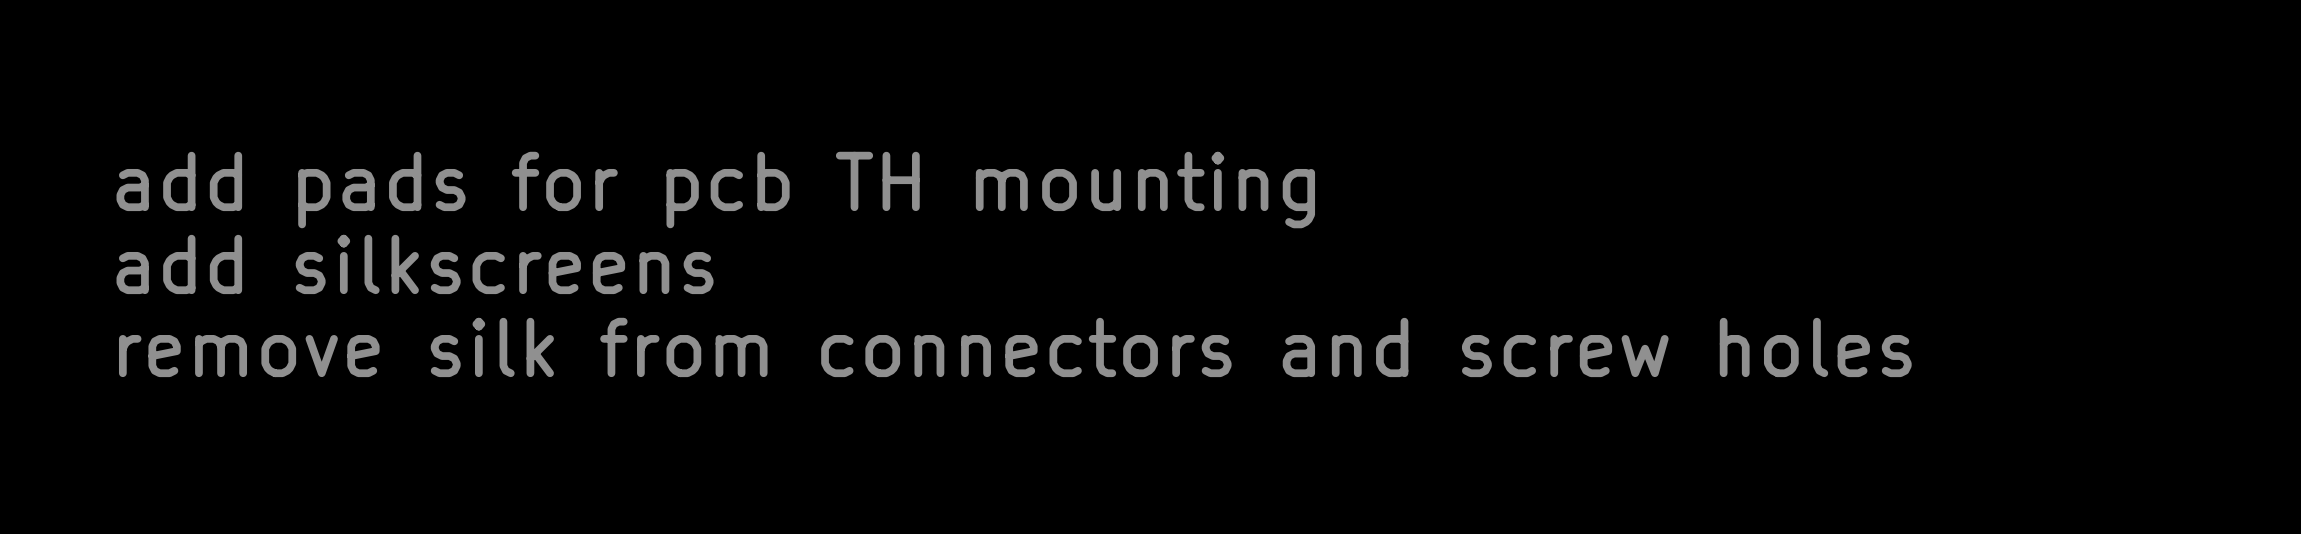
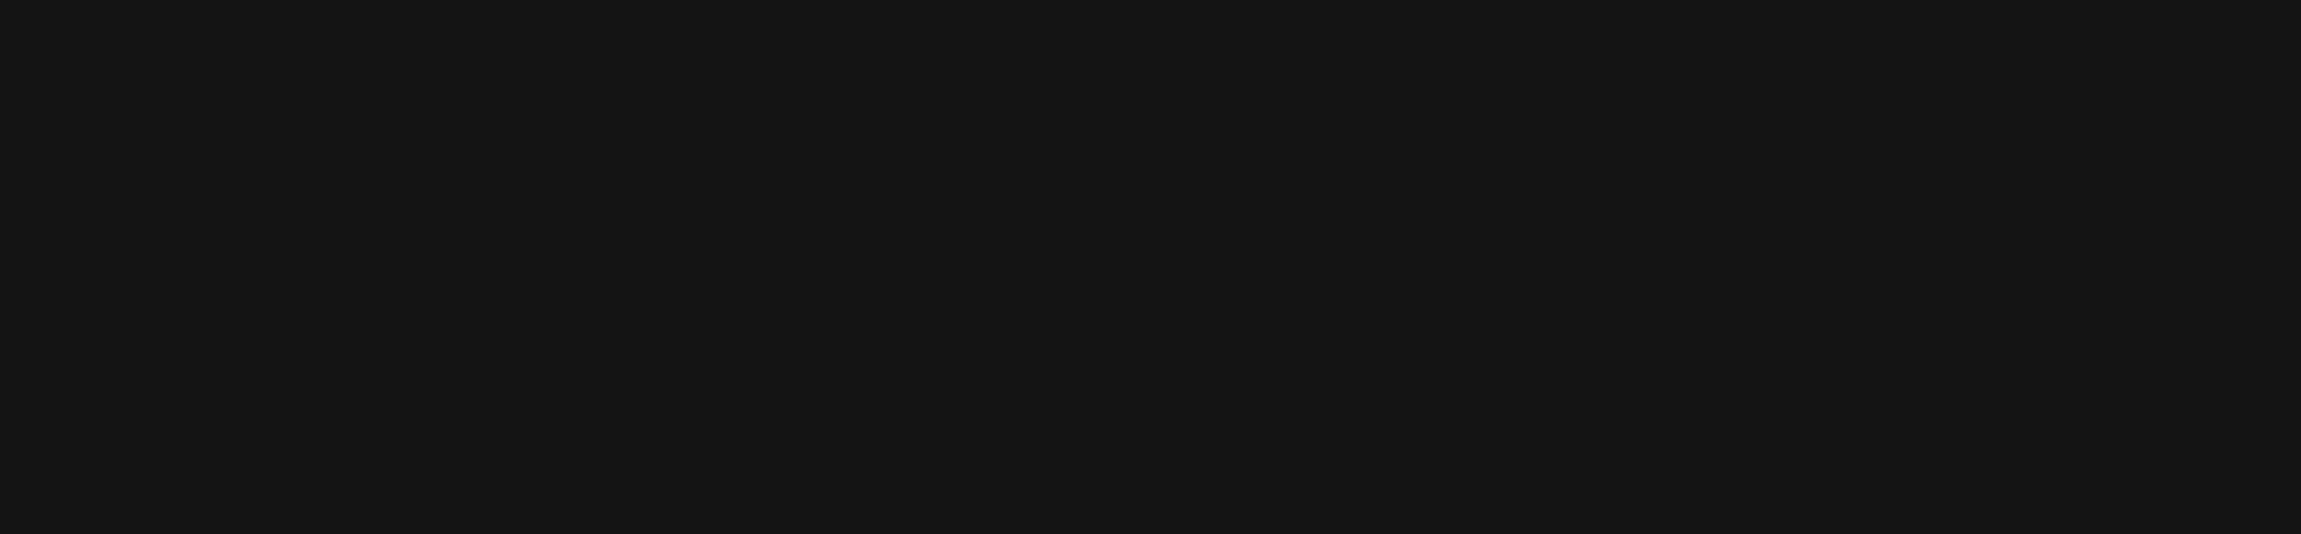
text: add pads for pcb TH mounting (715, 190) -> none
text: add silkscreens (415, 264) -> none
text: remove silk from connectors and screw holes (1015, 347) -> none

